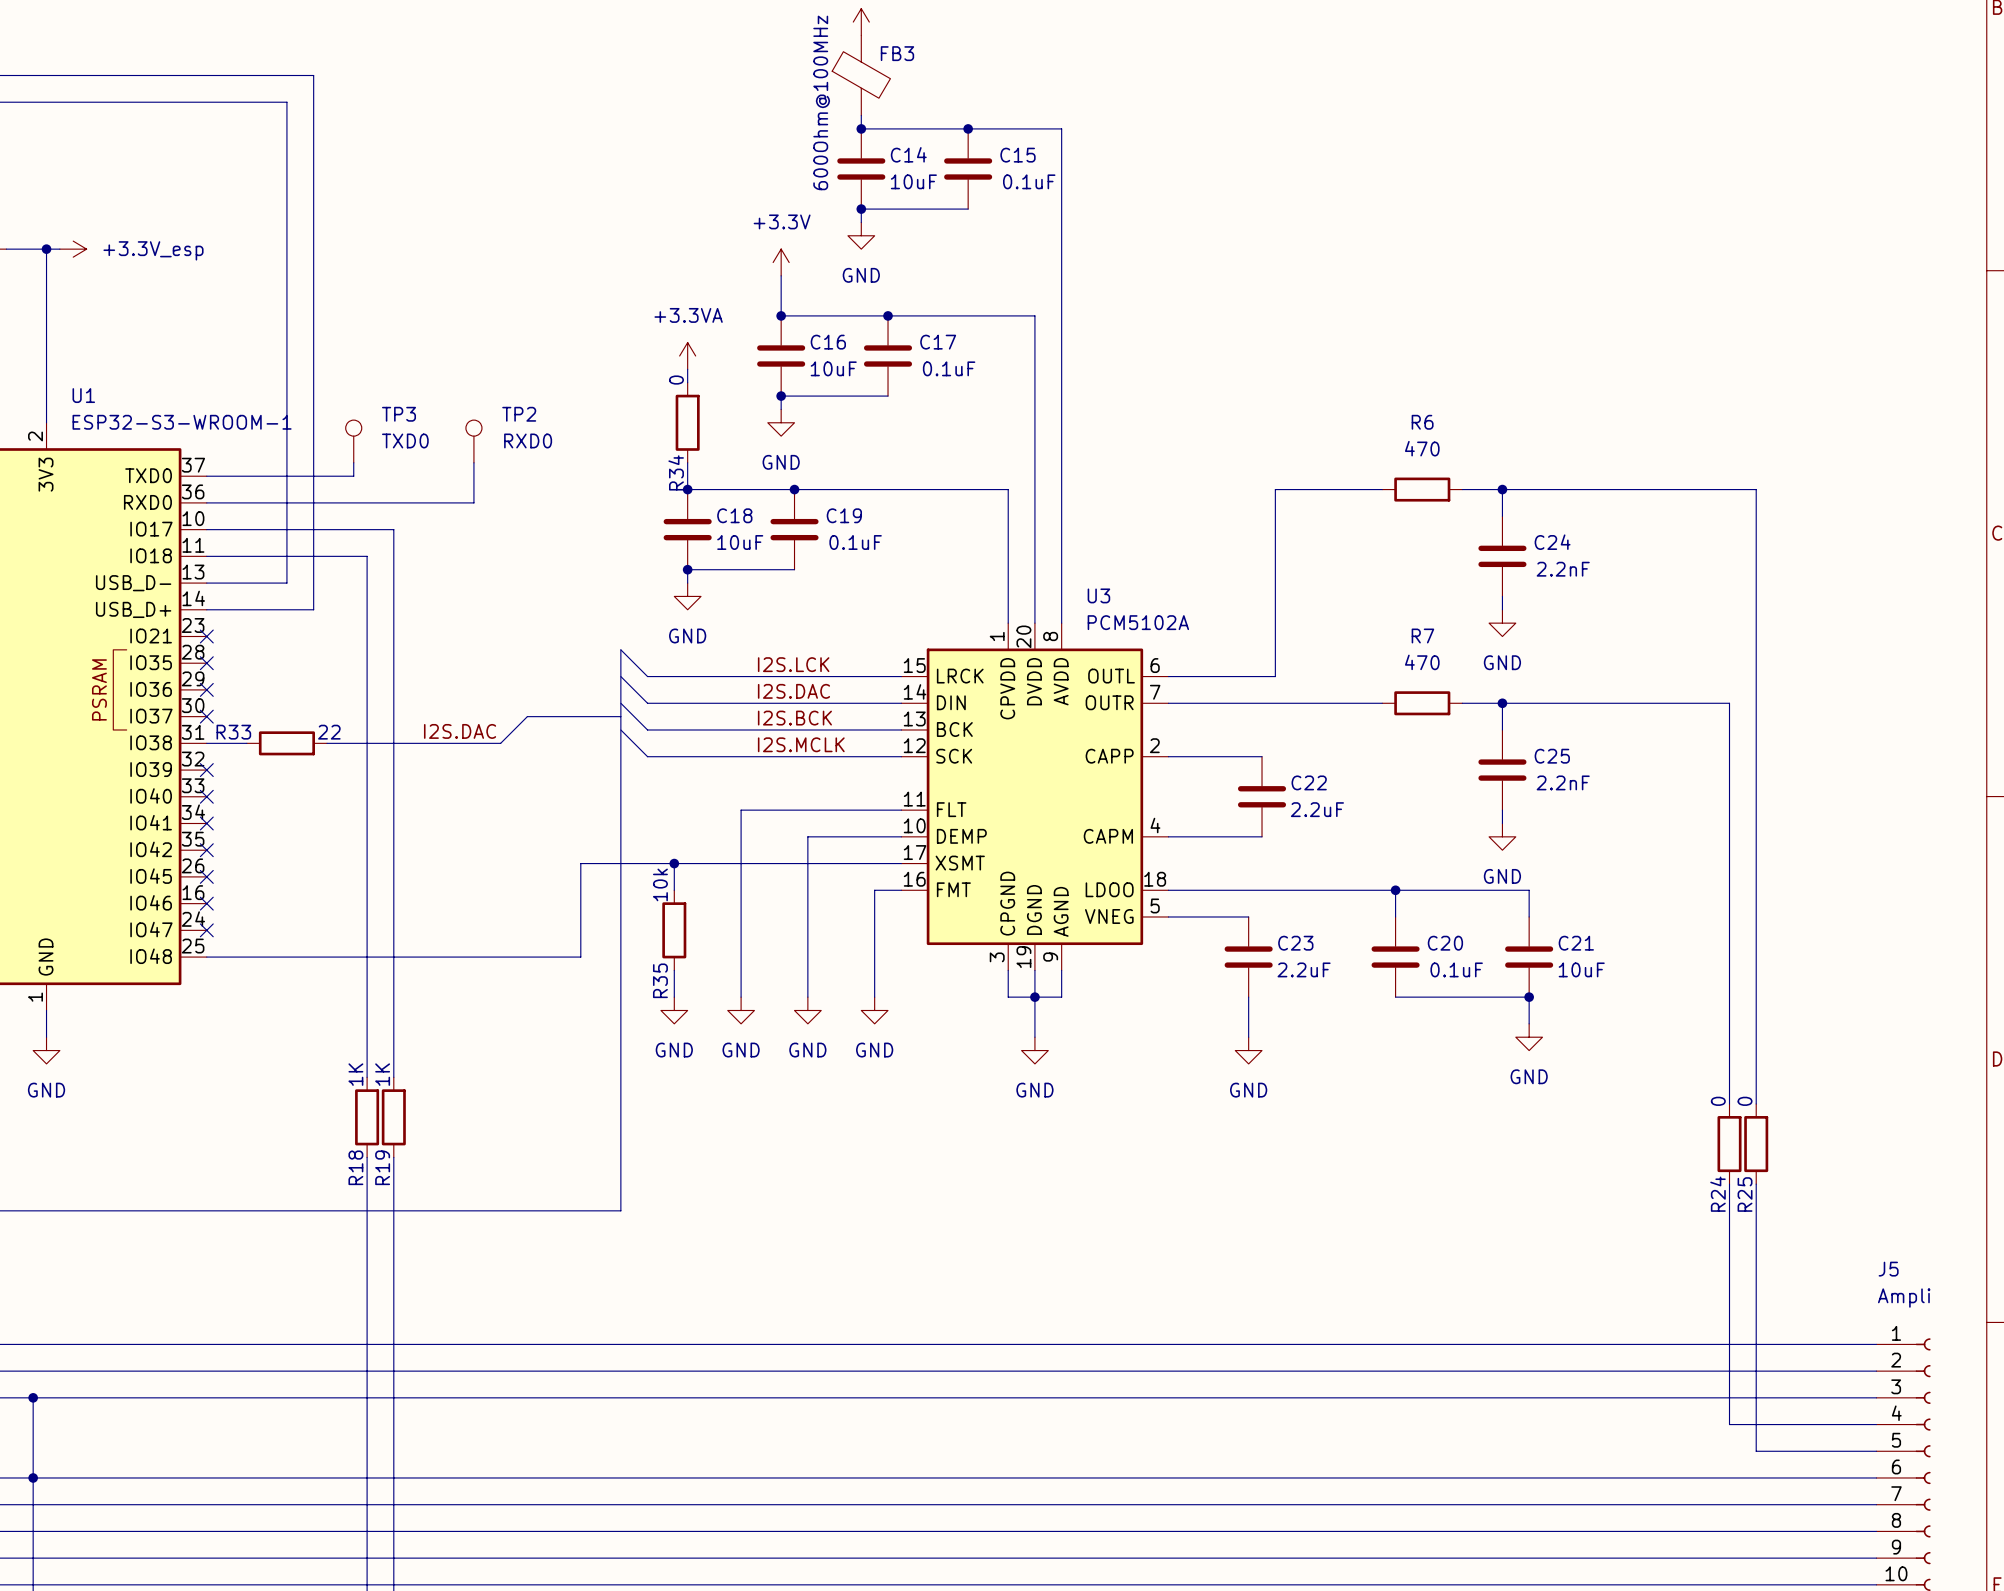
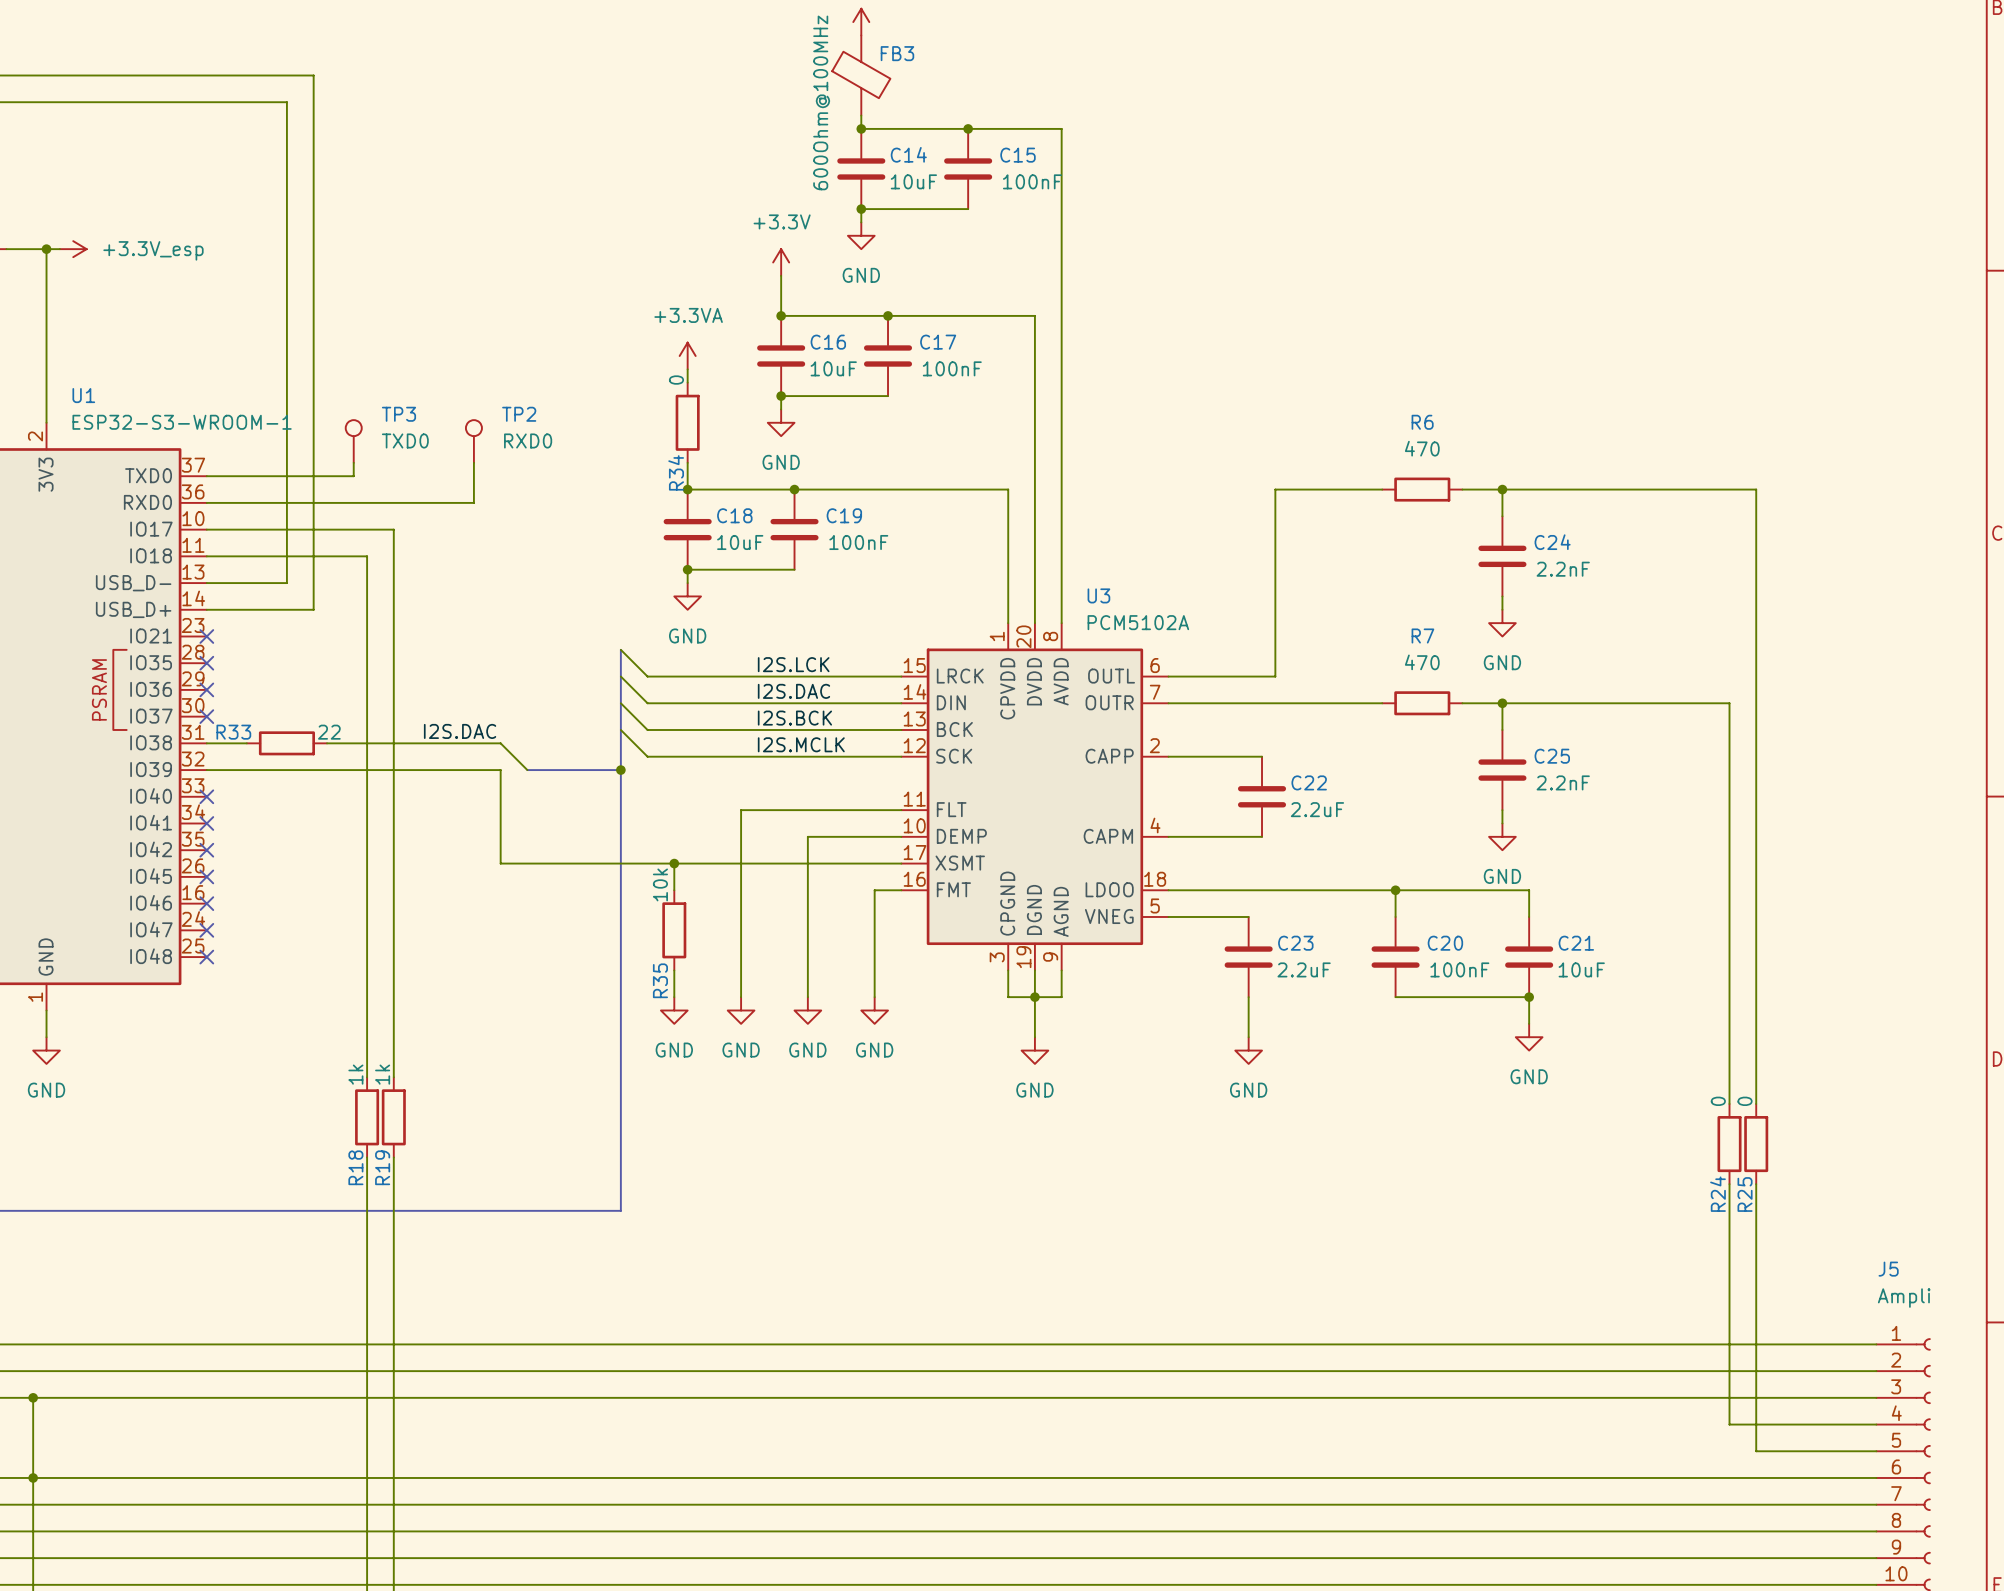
C15 value: 0.1uF (1029, 181) -> 100nF (1032, 181)
C17 value: 0.1uF (949, 368) -> 100nF (952, 368)
C19 value: 0.1uF (855, 542) -> 100nF (858, 542)
wire: (527, 716) (500, 743) -> (527, 770) (500, 743)
bus: (527, 716) (620, 716) -> (527, 770) (620, 770)
no-connect mark: (206, 770) -> none
junction: none -> (620, 770)
wire: (580, 863) (580, 957) (206, 957) -> (580, 863) (500, 863) (500, 770) (206, 770)
no-connect mark: none -> (206, 957)
C20 value: 0.1uF (1456, 969) -> 100nF (1459, 969)
R18 value: 1K (355, 1074) -> 1k (355, 1074)
R19 value: 1K (382, 1074) -> 1k (382, 1074)

